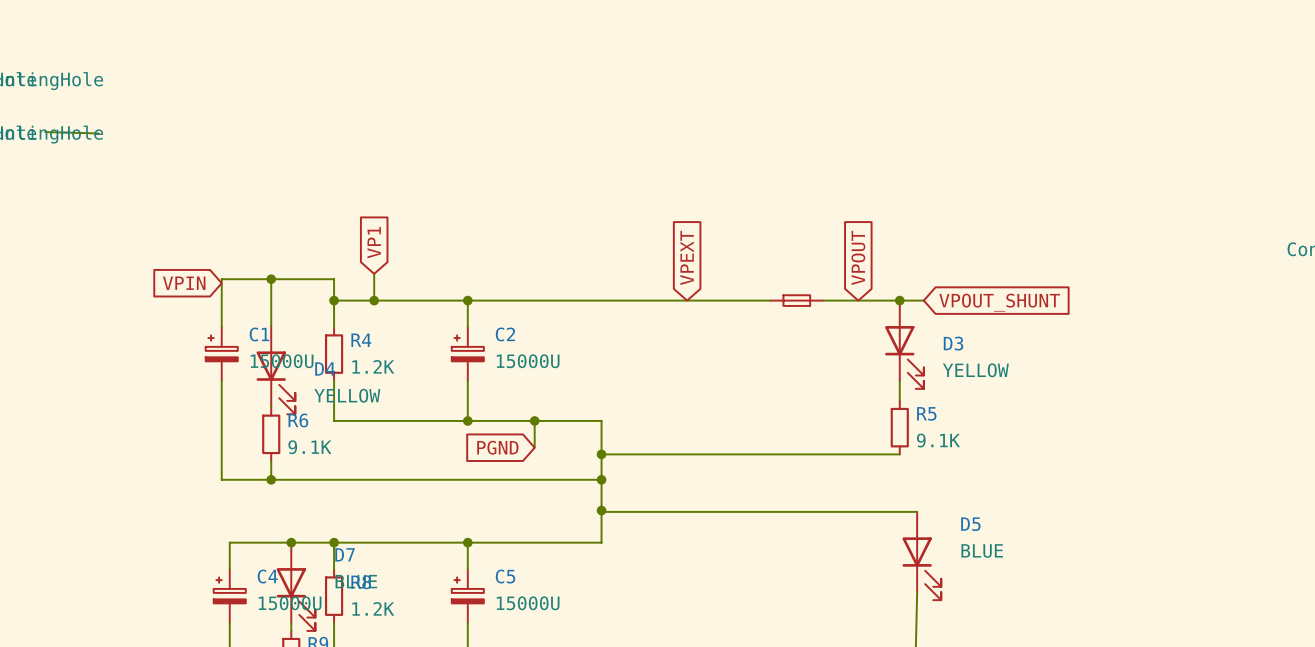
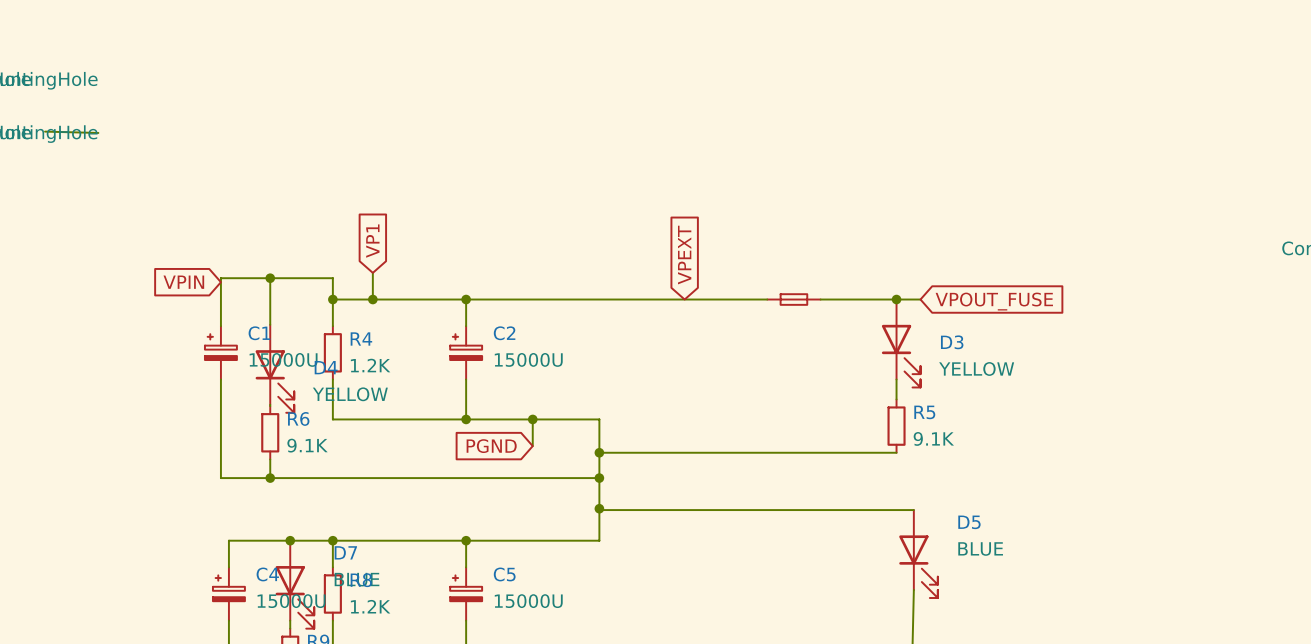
global label: VPOUT (858, 257) -> none
global label: VPOUT_SHUNT (999, 302) -> VPOUT_FUSE (994, 301)

